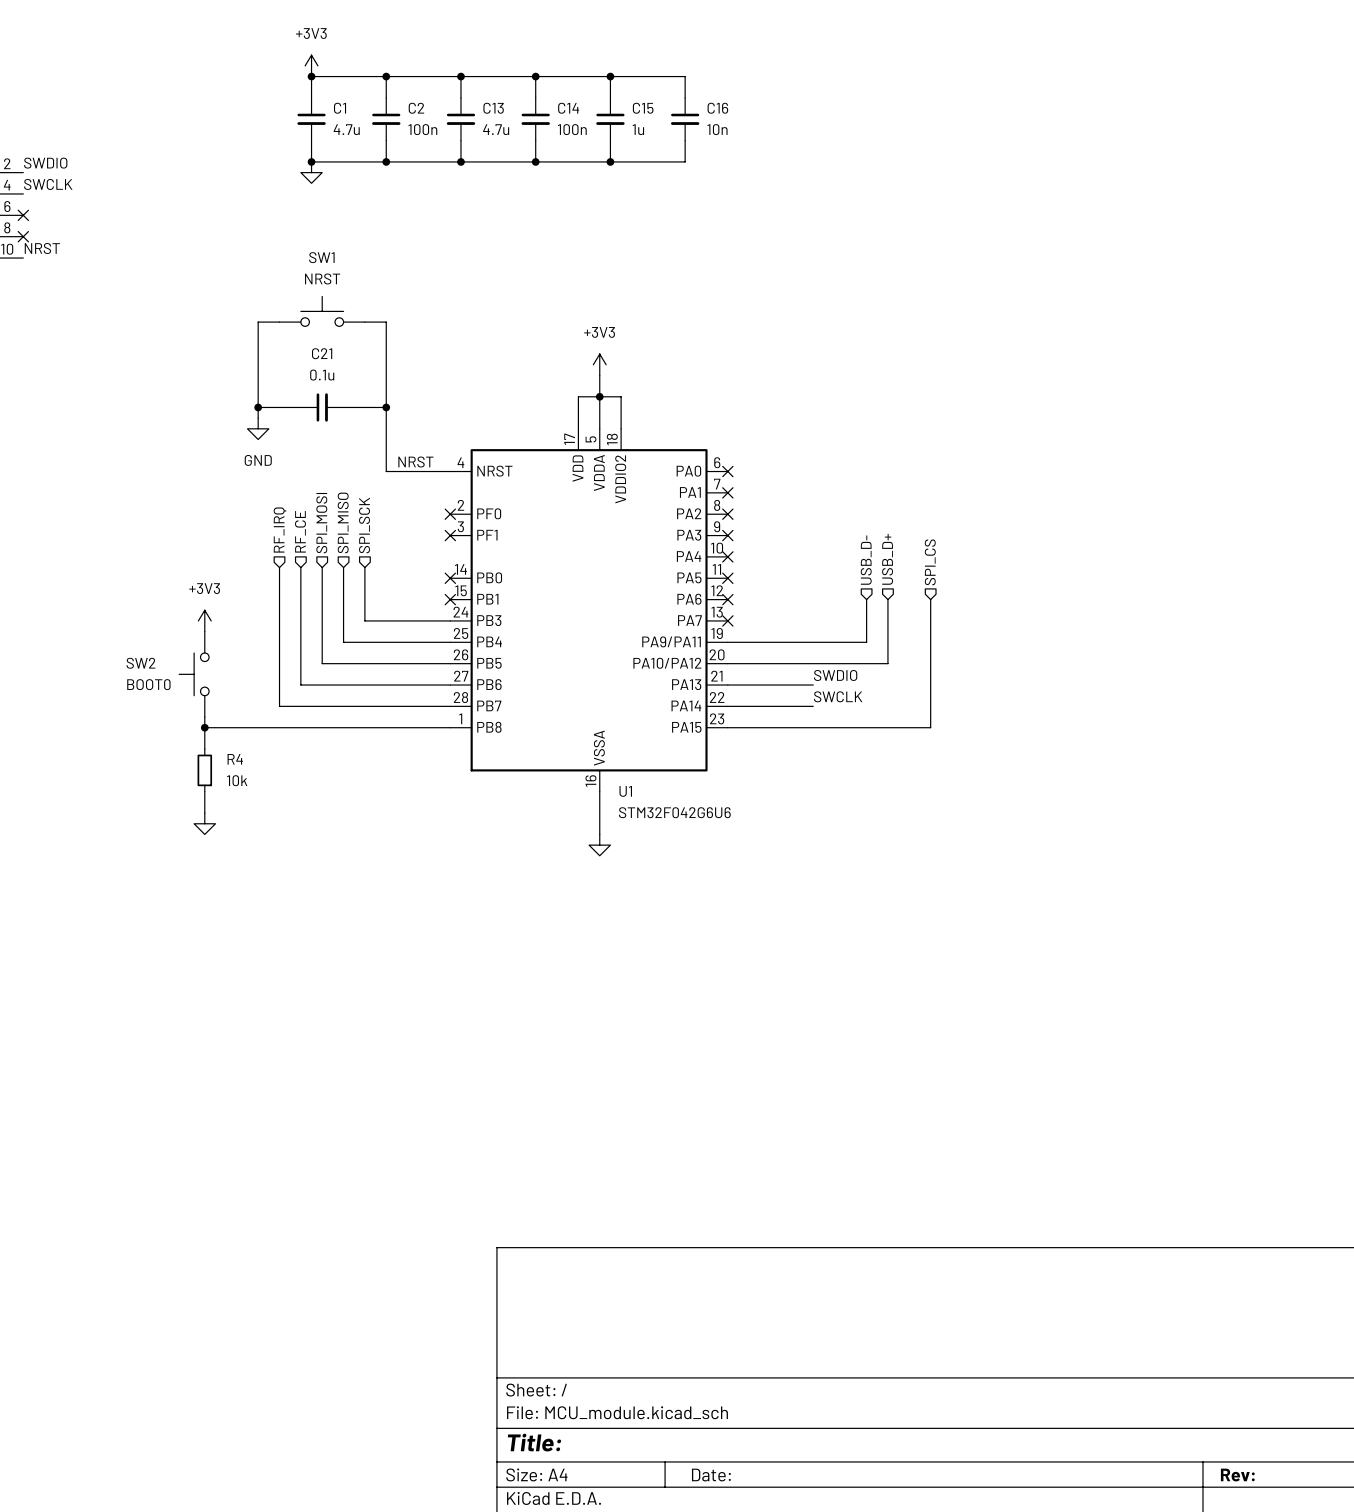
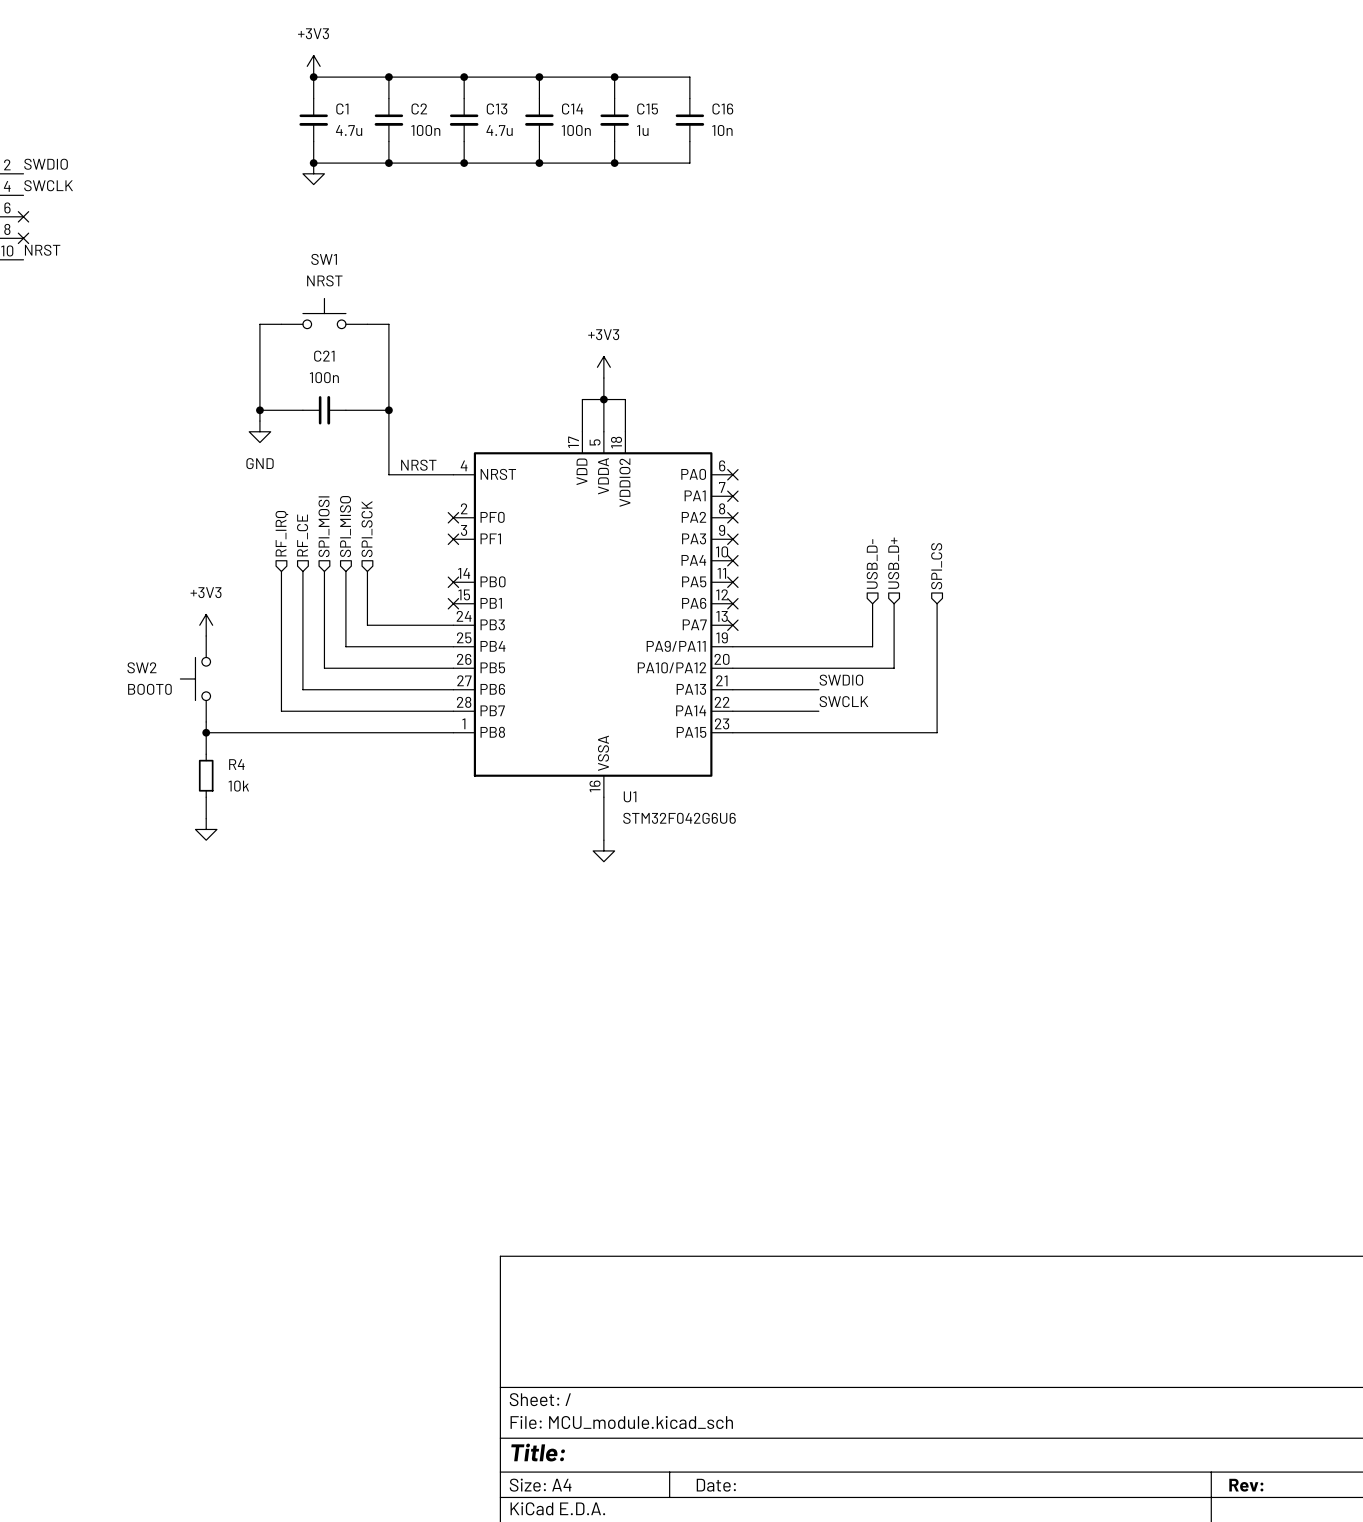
C21 value: 0.1u (322, 375) -> 100n (324, 377)

